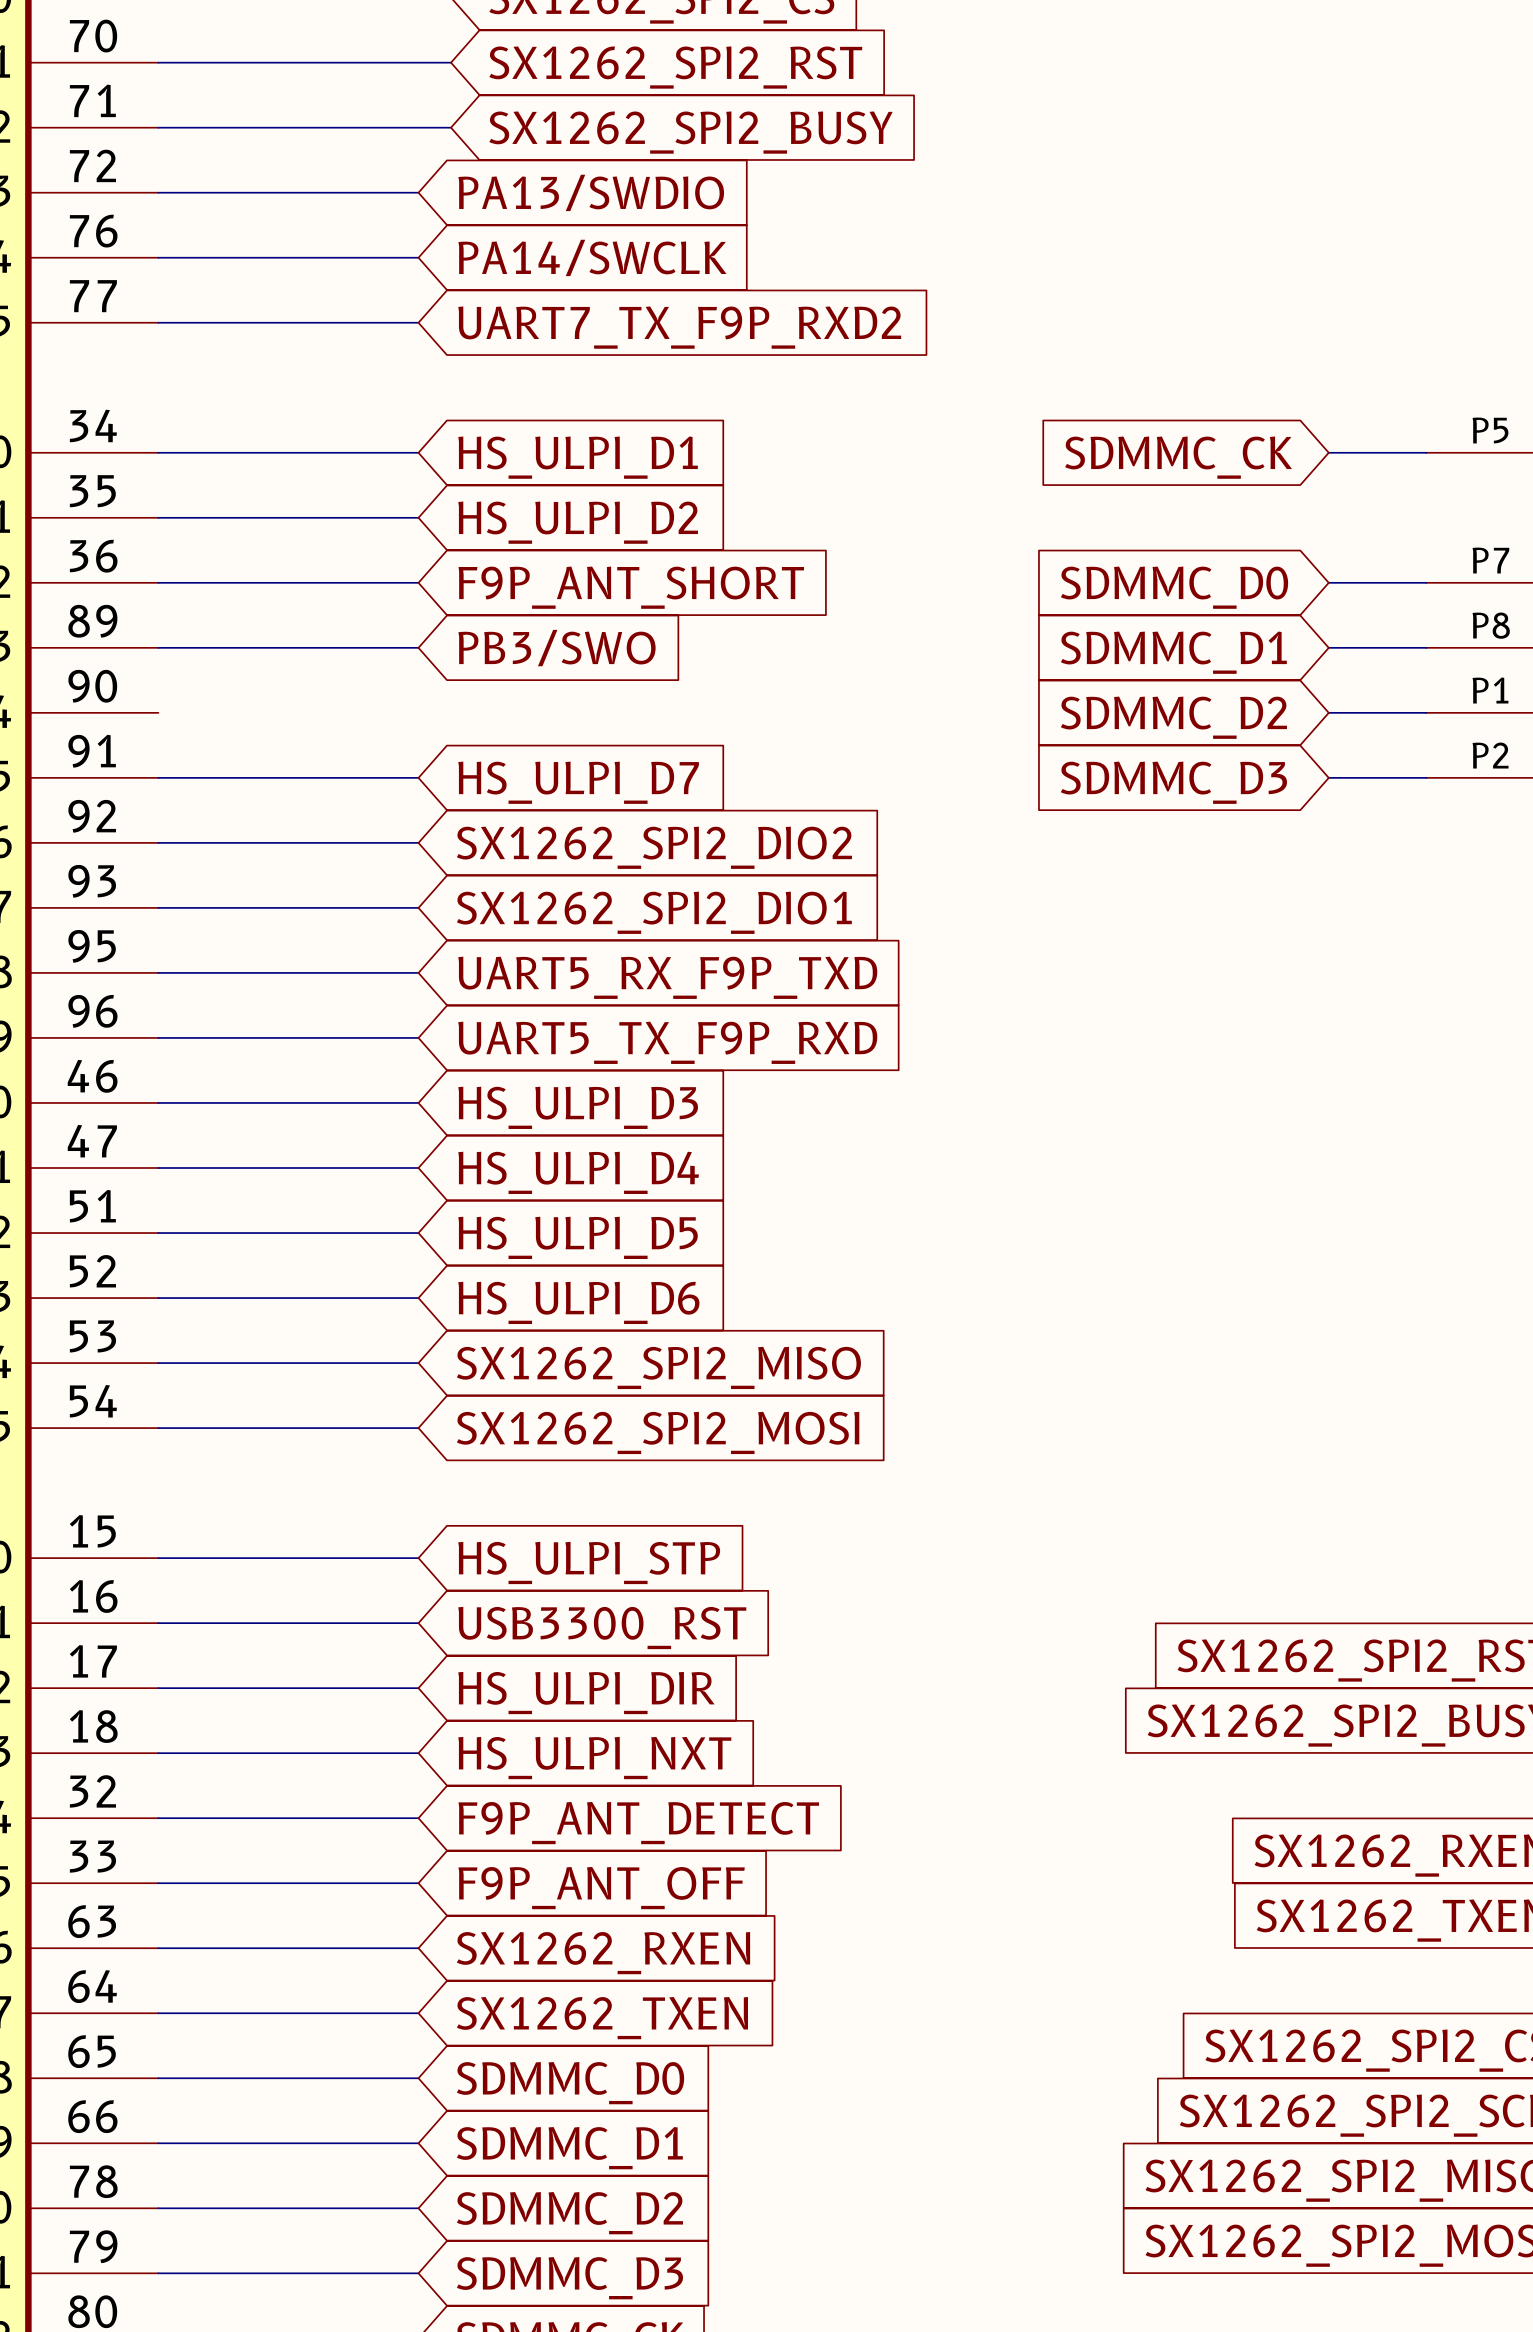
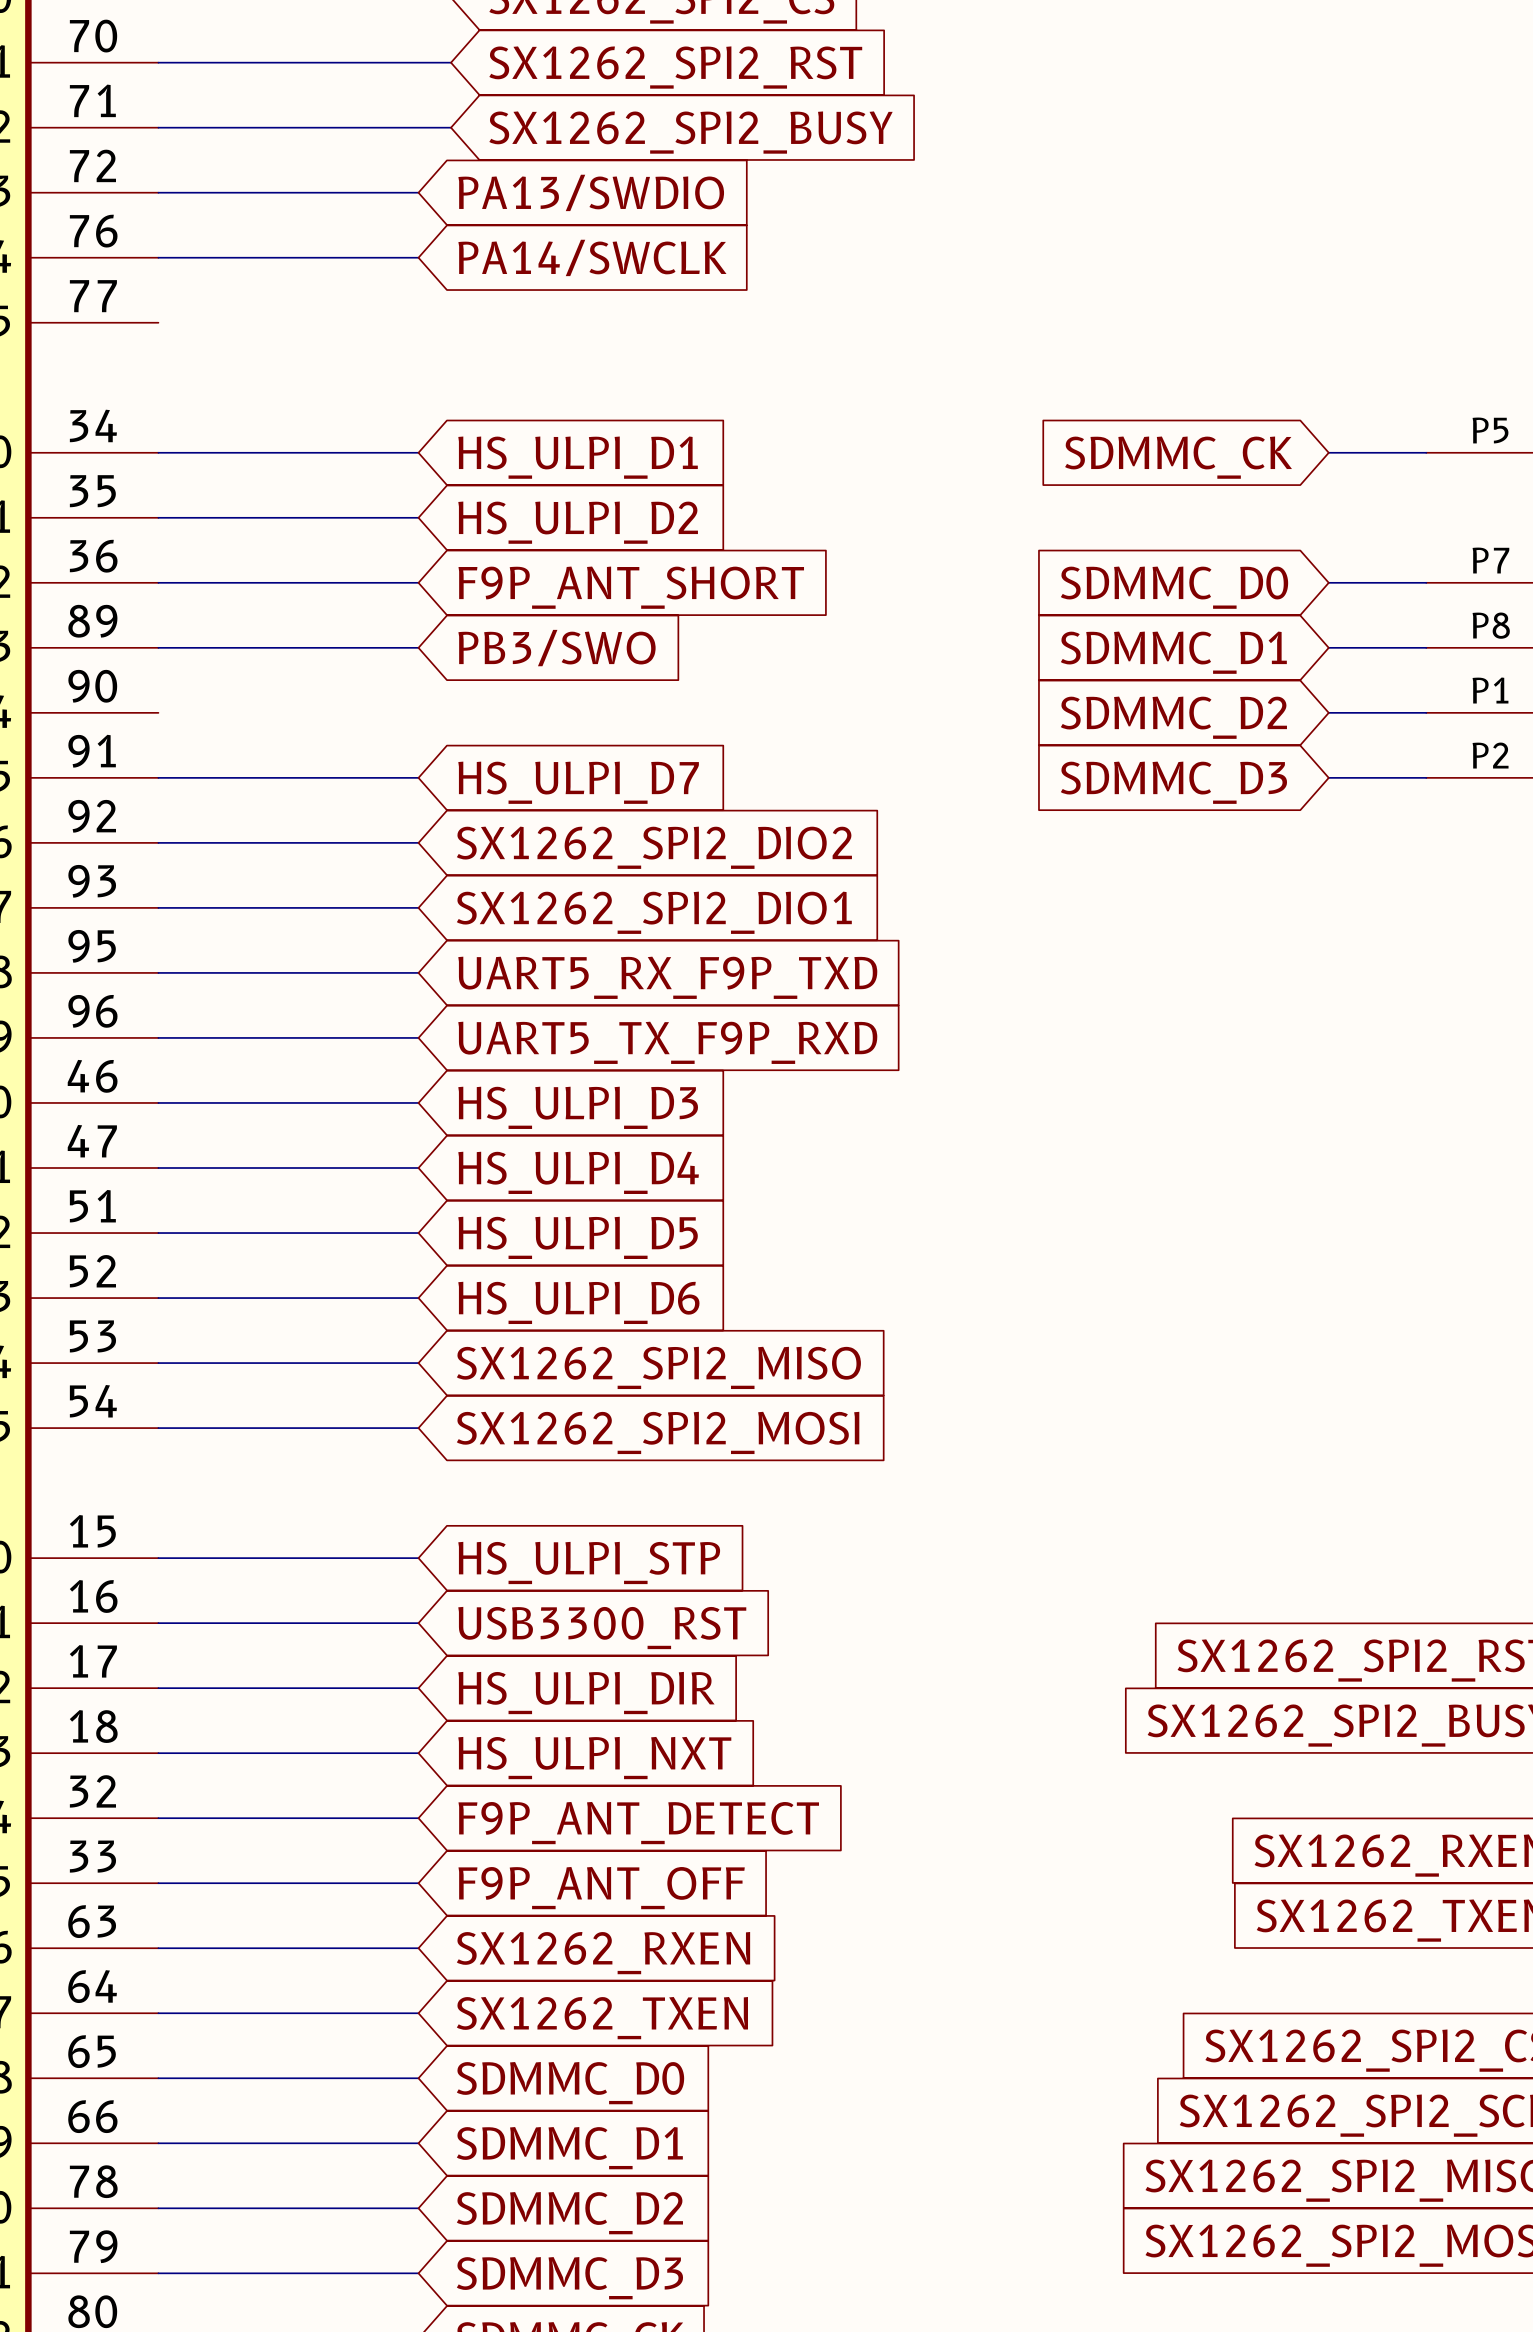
wire: (158, 322) (418, 322) -> none
global label: UART7_TX_F9P_RXD2 (679, 327) -> none

